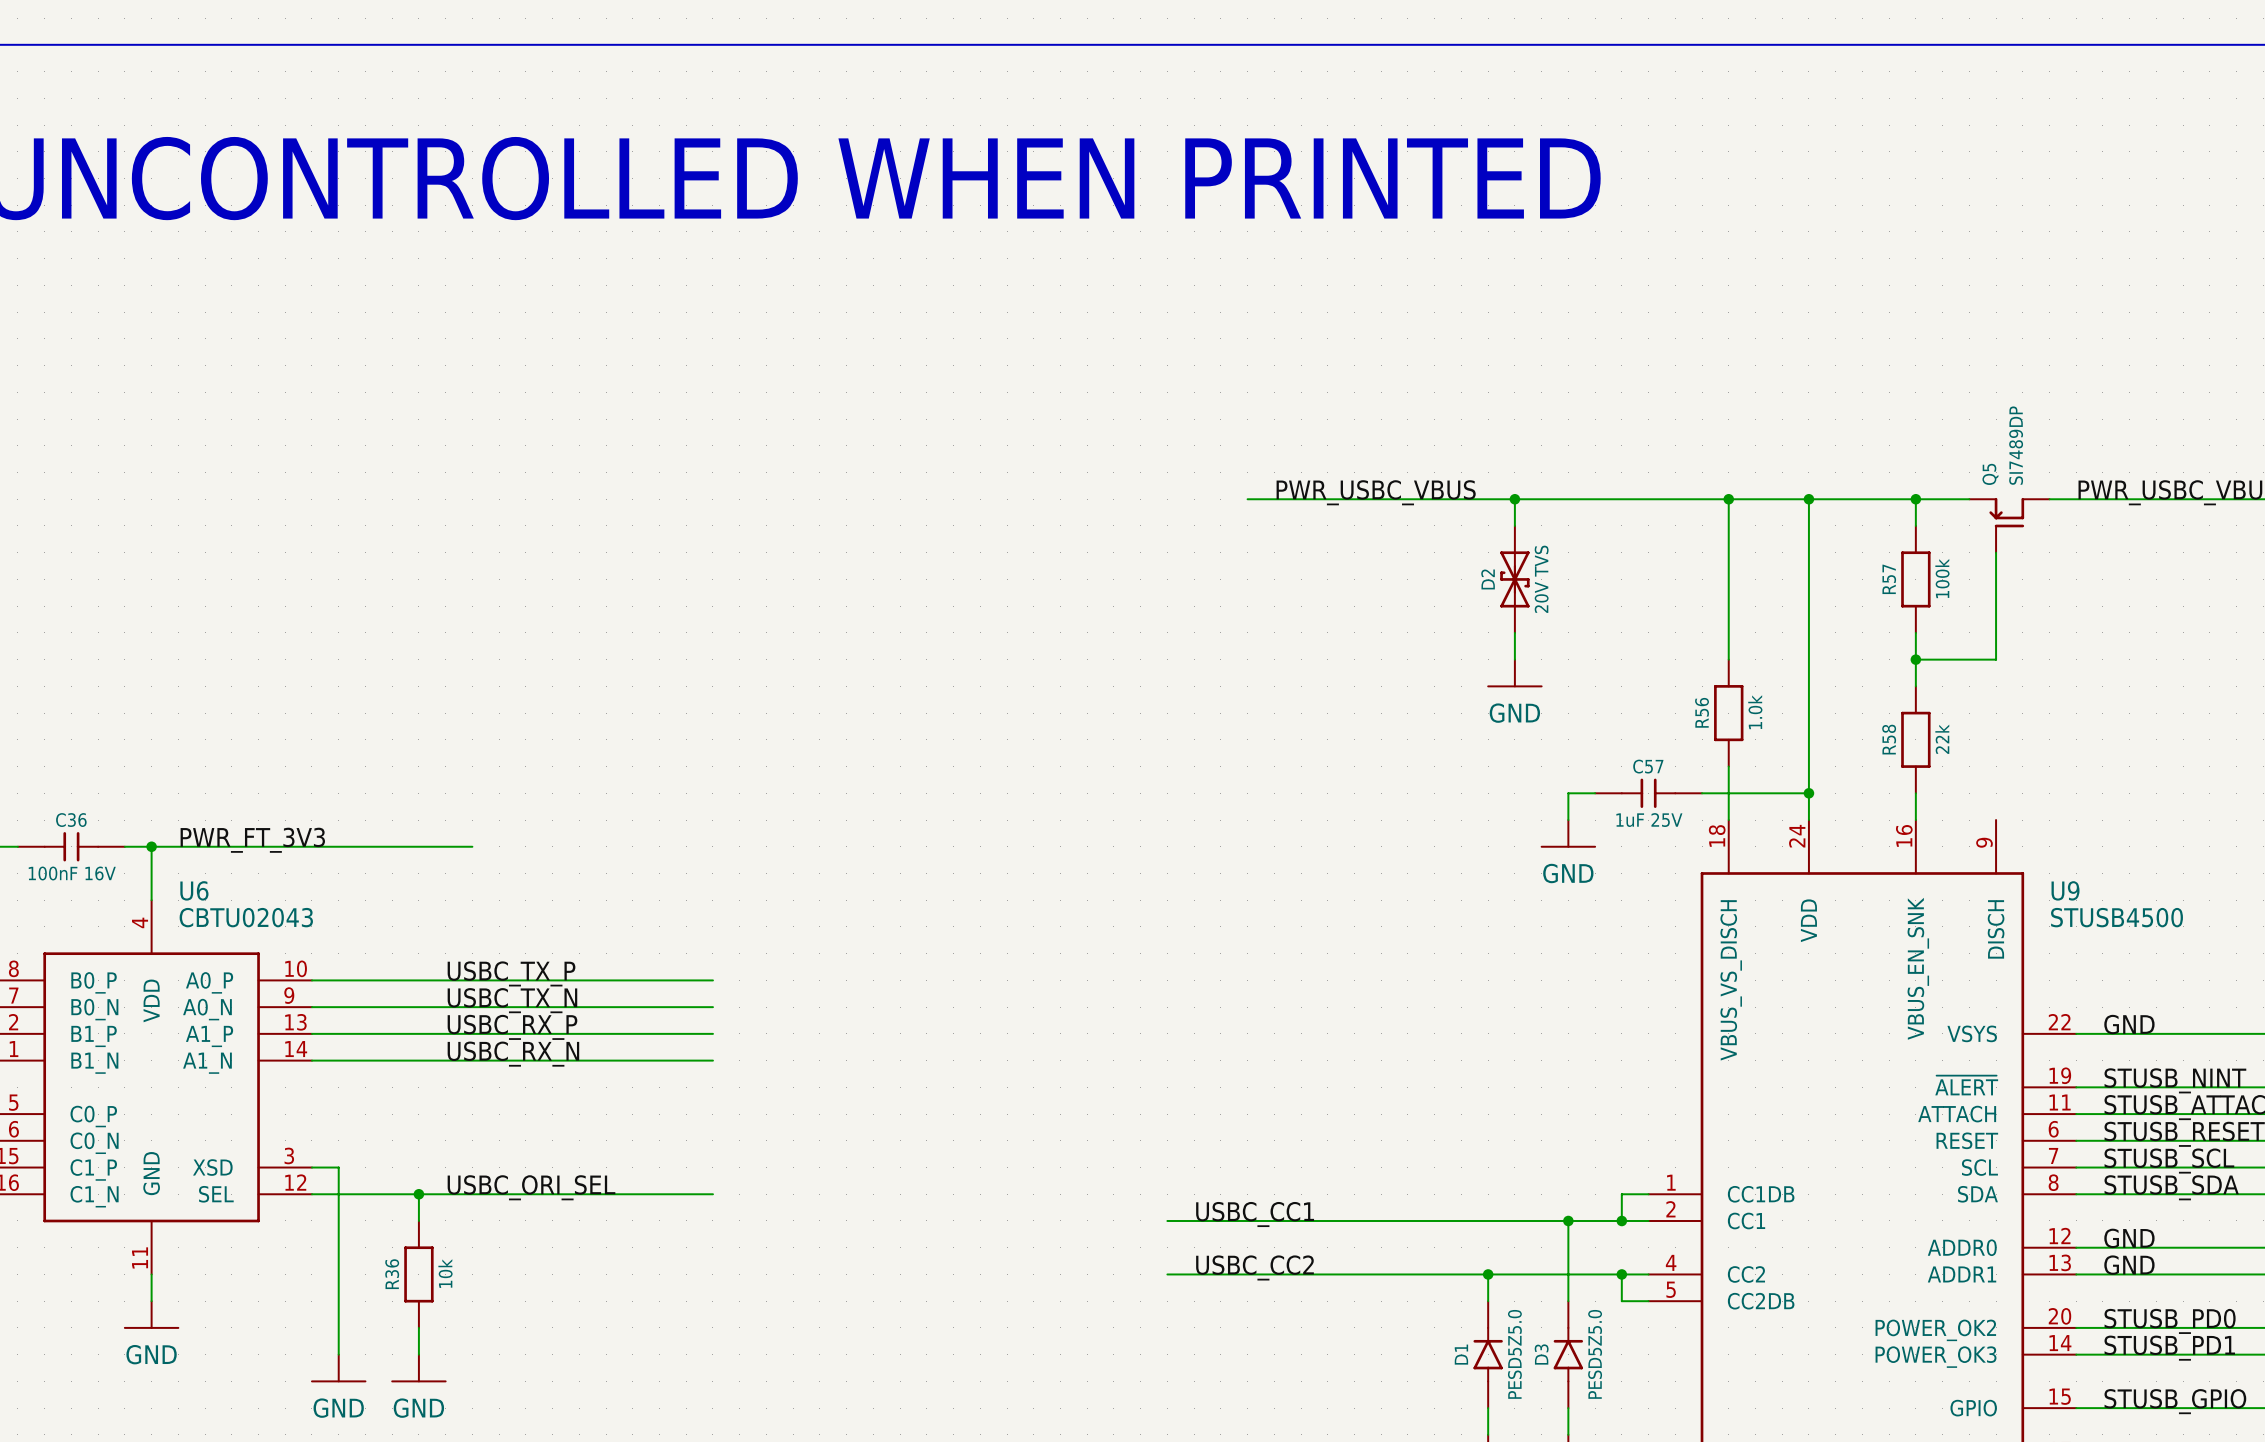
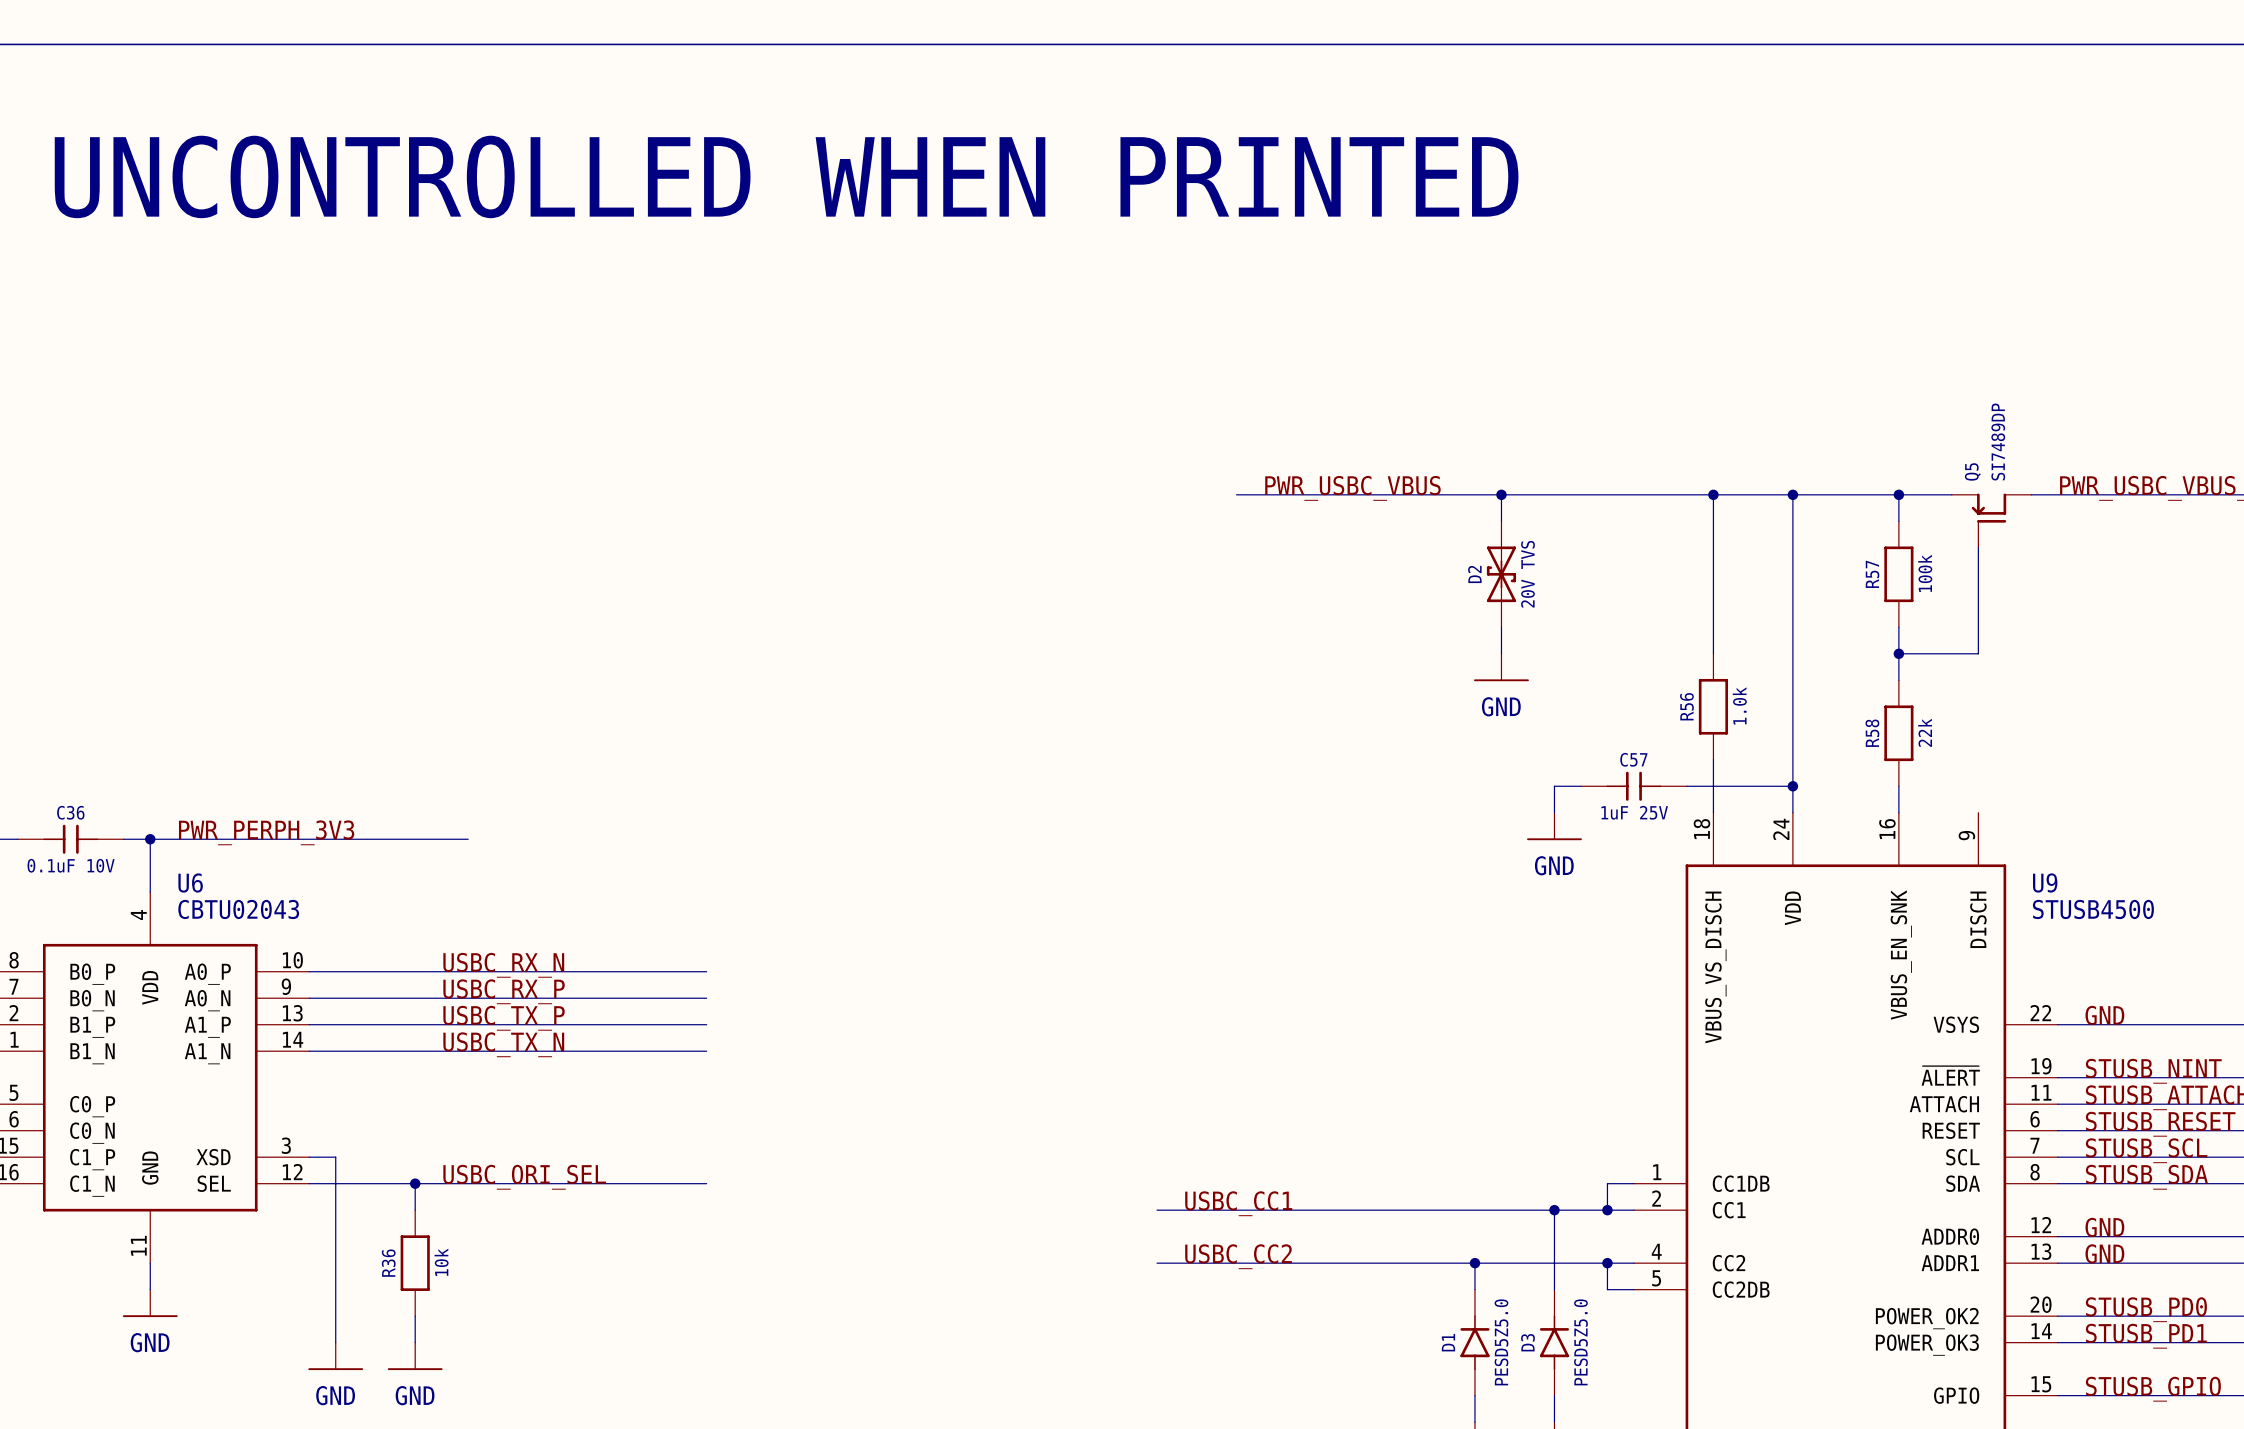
label: PWR_FT_3V3 (252, 840) -> PWR_PERPH_3V3 (266, 832)
C36 value: 100nF 16V (72, 873) -> 0.1uF 10V (71, 865)
label: USBC_TX_P (511, 973) -> USBC_RX_N (503, 965)
label: USBC_TX_N (512, 1000) -> USBC_RX_P (504, 991)
label: USBC_RX_P (512, 1027) -> USBC_TX_P (504, 1018)
label: USBC_RX_N (513, 1054) -> USBC_TX_N (503, 1044)

